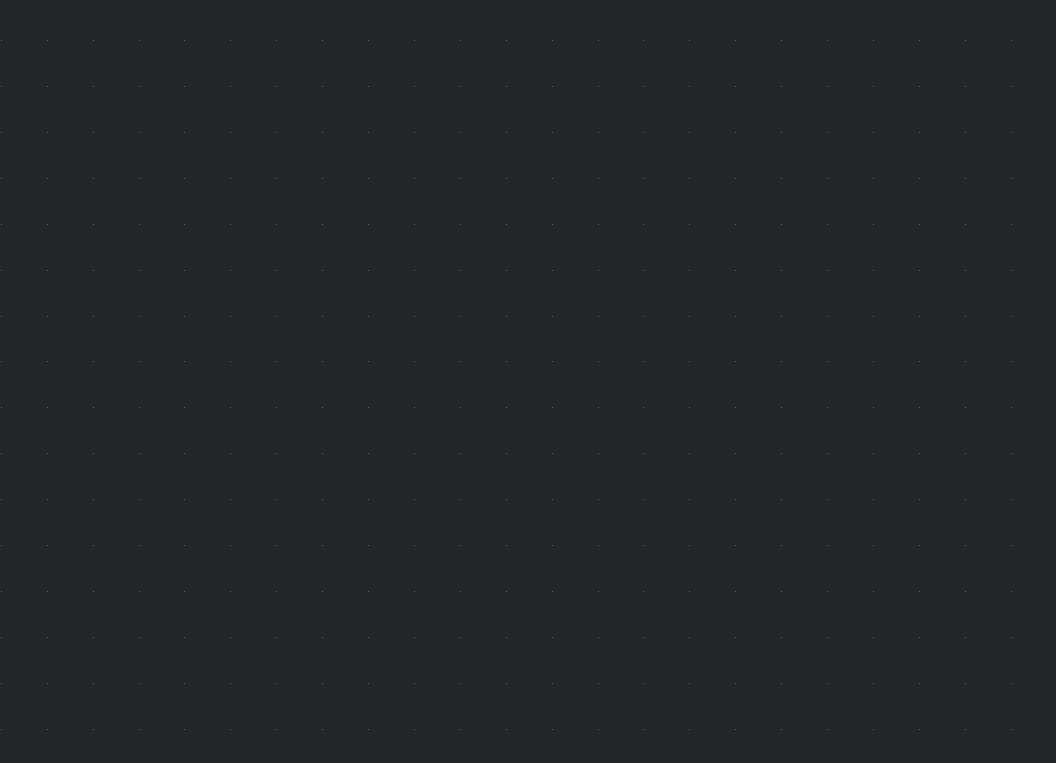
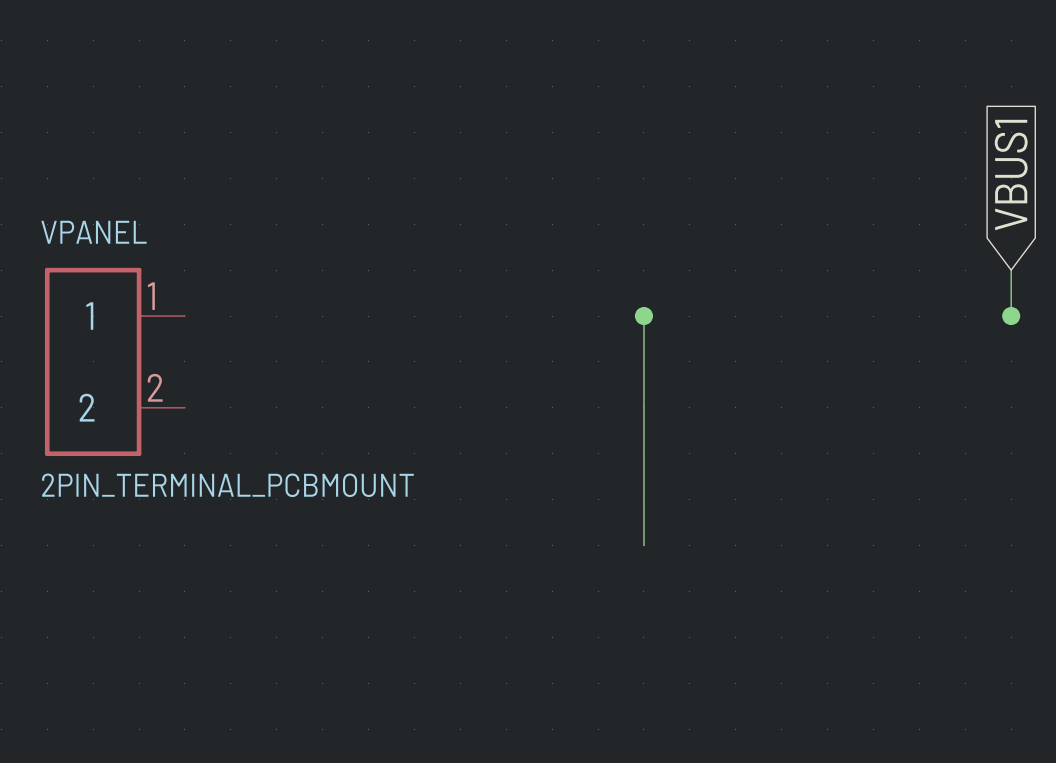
global label: none -> VBUS1 (1011, 174)
wire: none -> (1011, 270) (1011, 316)
wire: none -> (643, 316) (643, 545)
junction: none -> (643, 316)
junction: none -> (1011, 316)
VPANEL: none -> 2PIN_TERMINAL_PCBMOUNT (114, 361)

